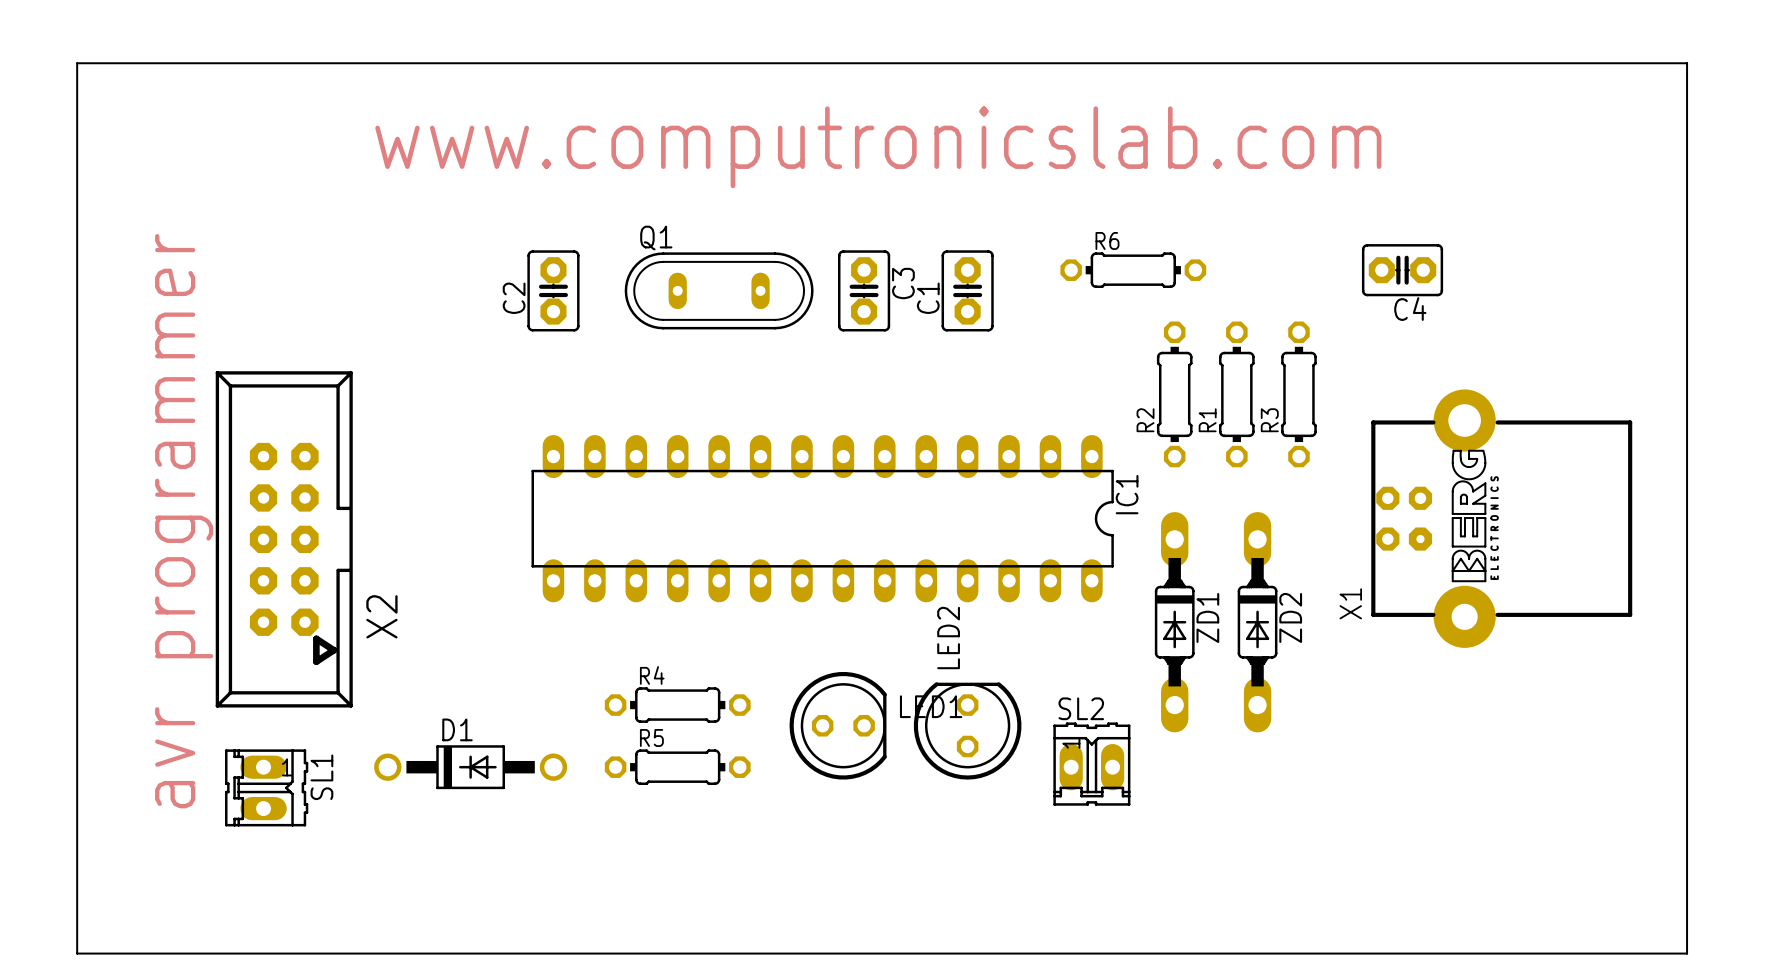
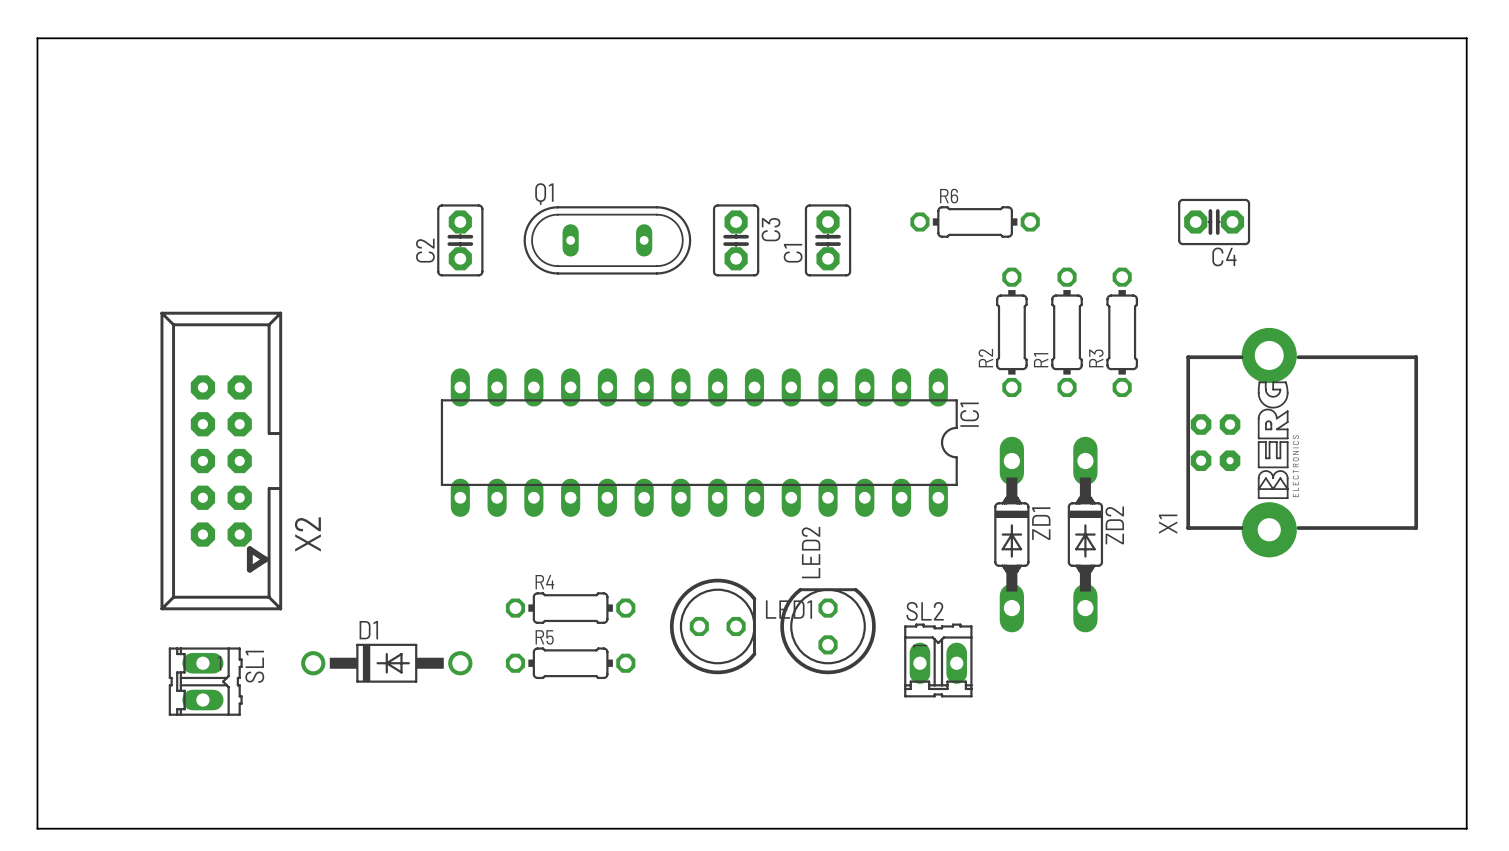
text: www.computronicslab.com (878, 147) -> none
text: avr programmer (184, 521) -> none

